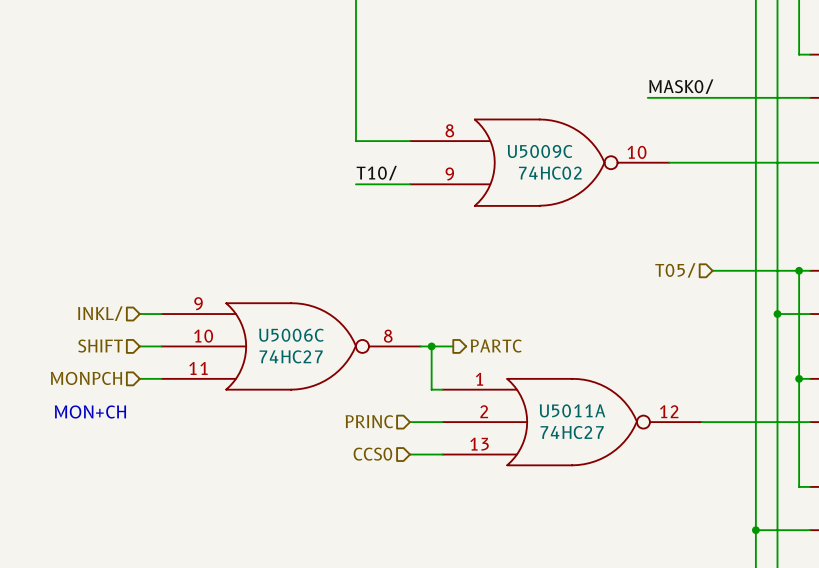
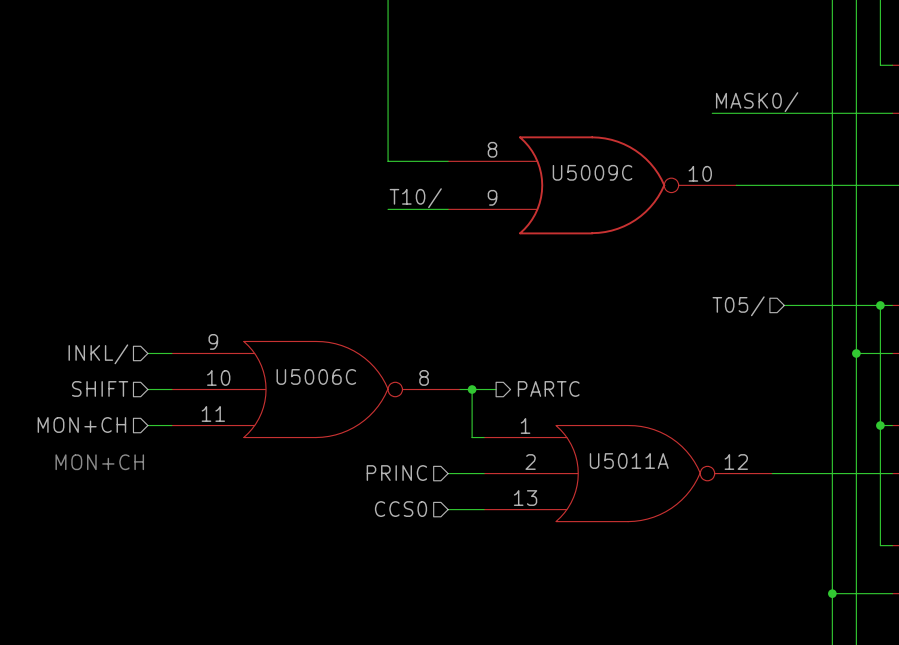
U5009C value: 74HC02 (550, 173) -> none
U5006C value: 74HC27 (291, 356) -> none
hierarchical label: MONPCH (86, 378) -> MON+CH (81, 424)
U5011A value: 74HC27 (572, 432) -> none

